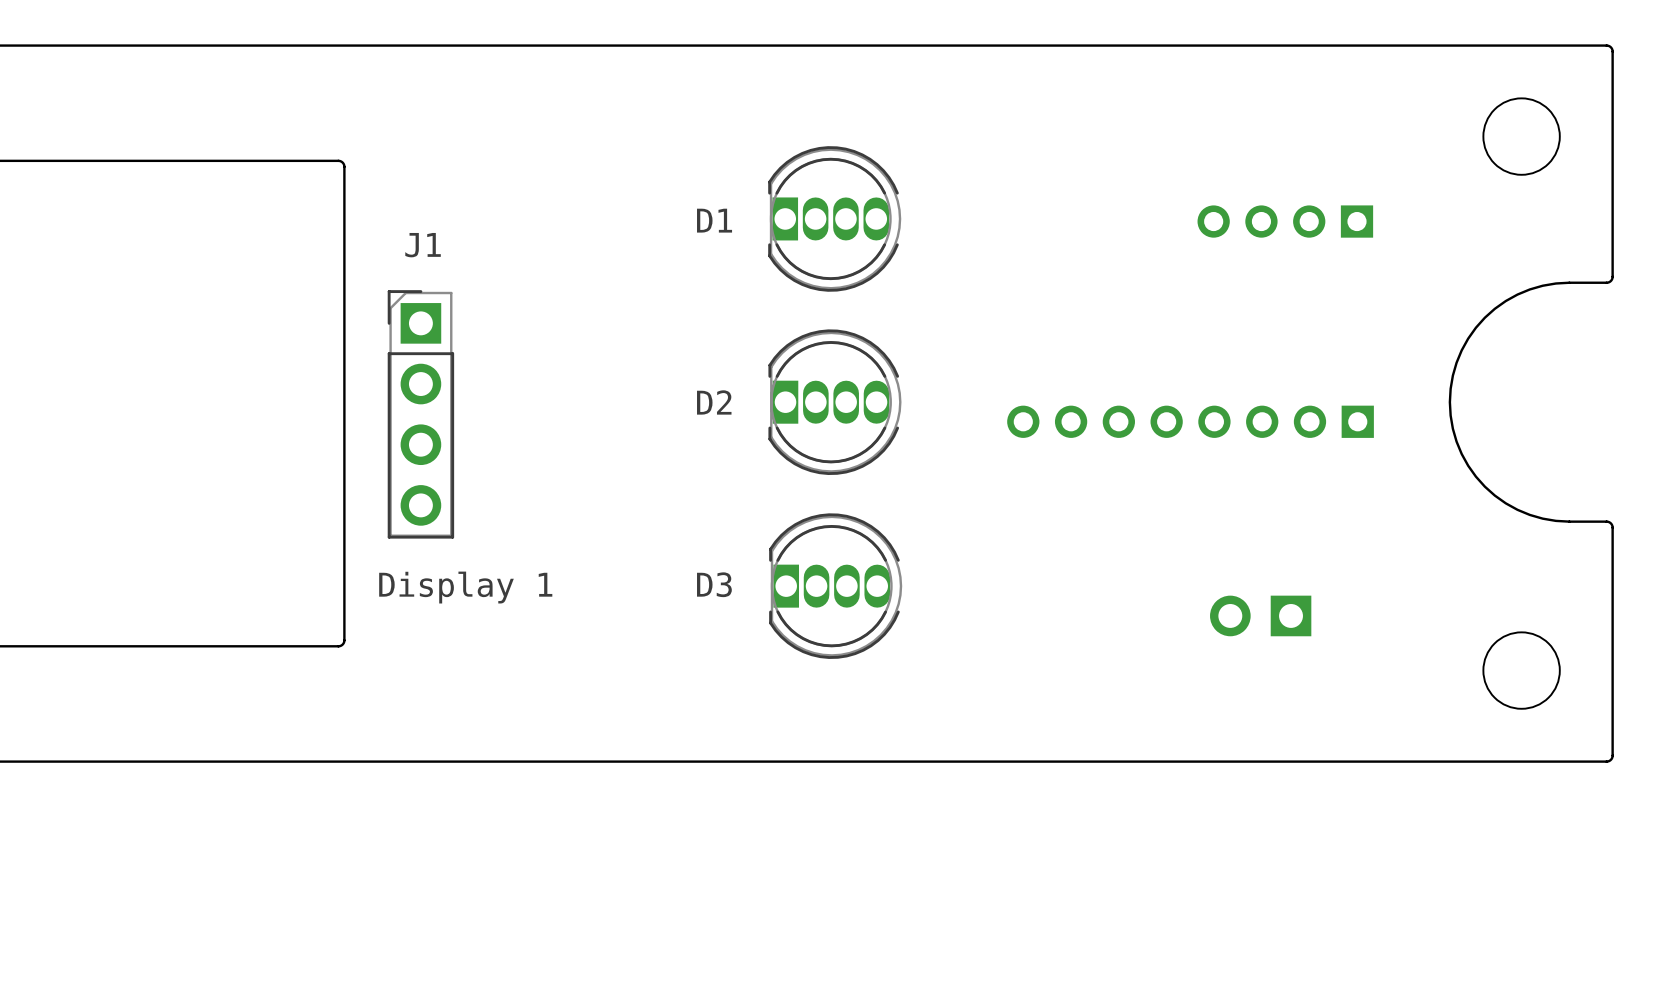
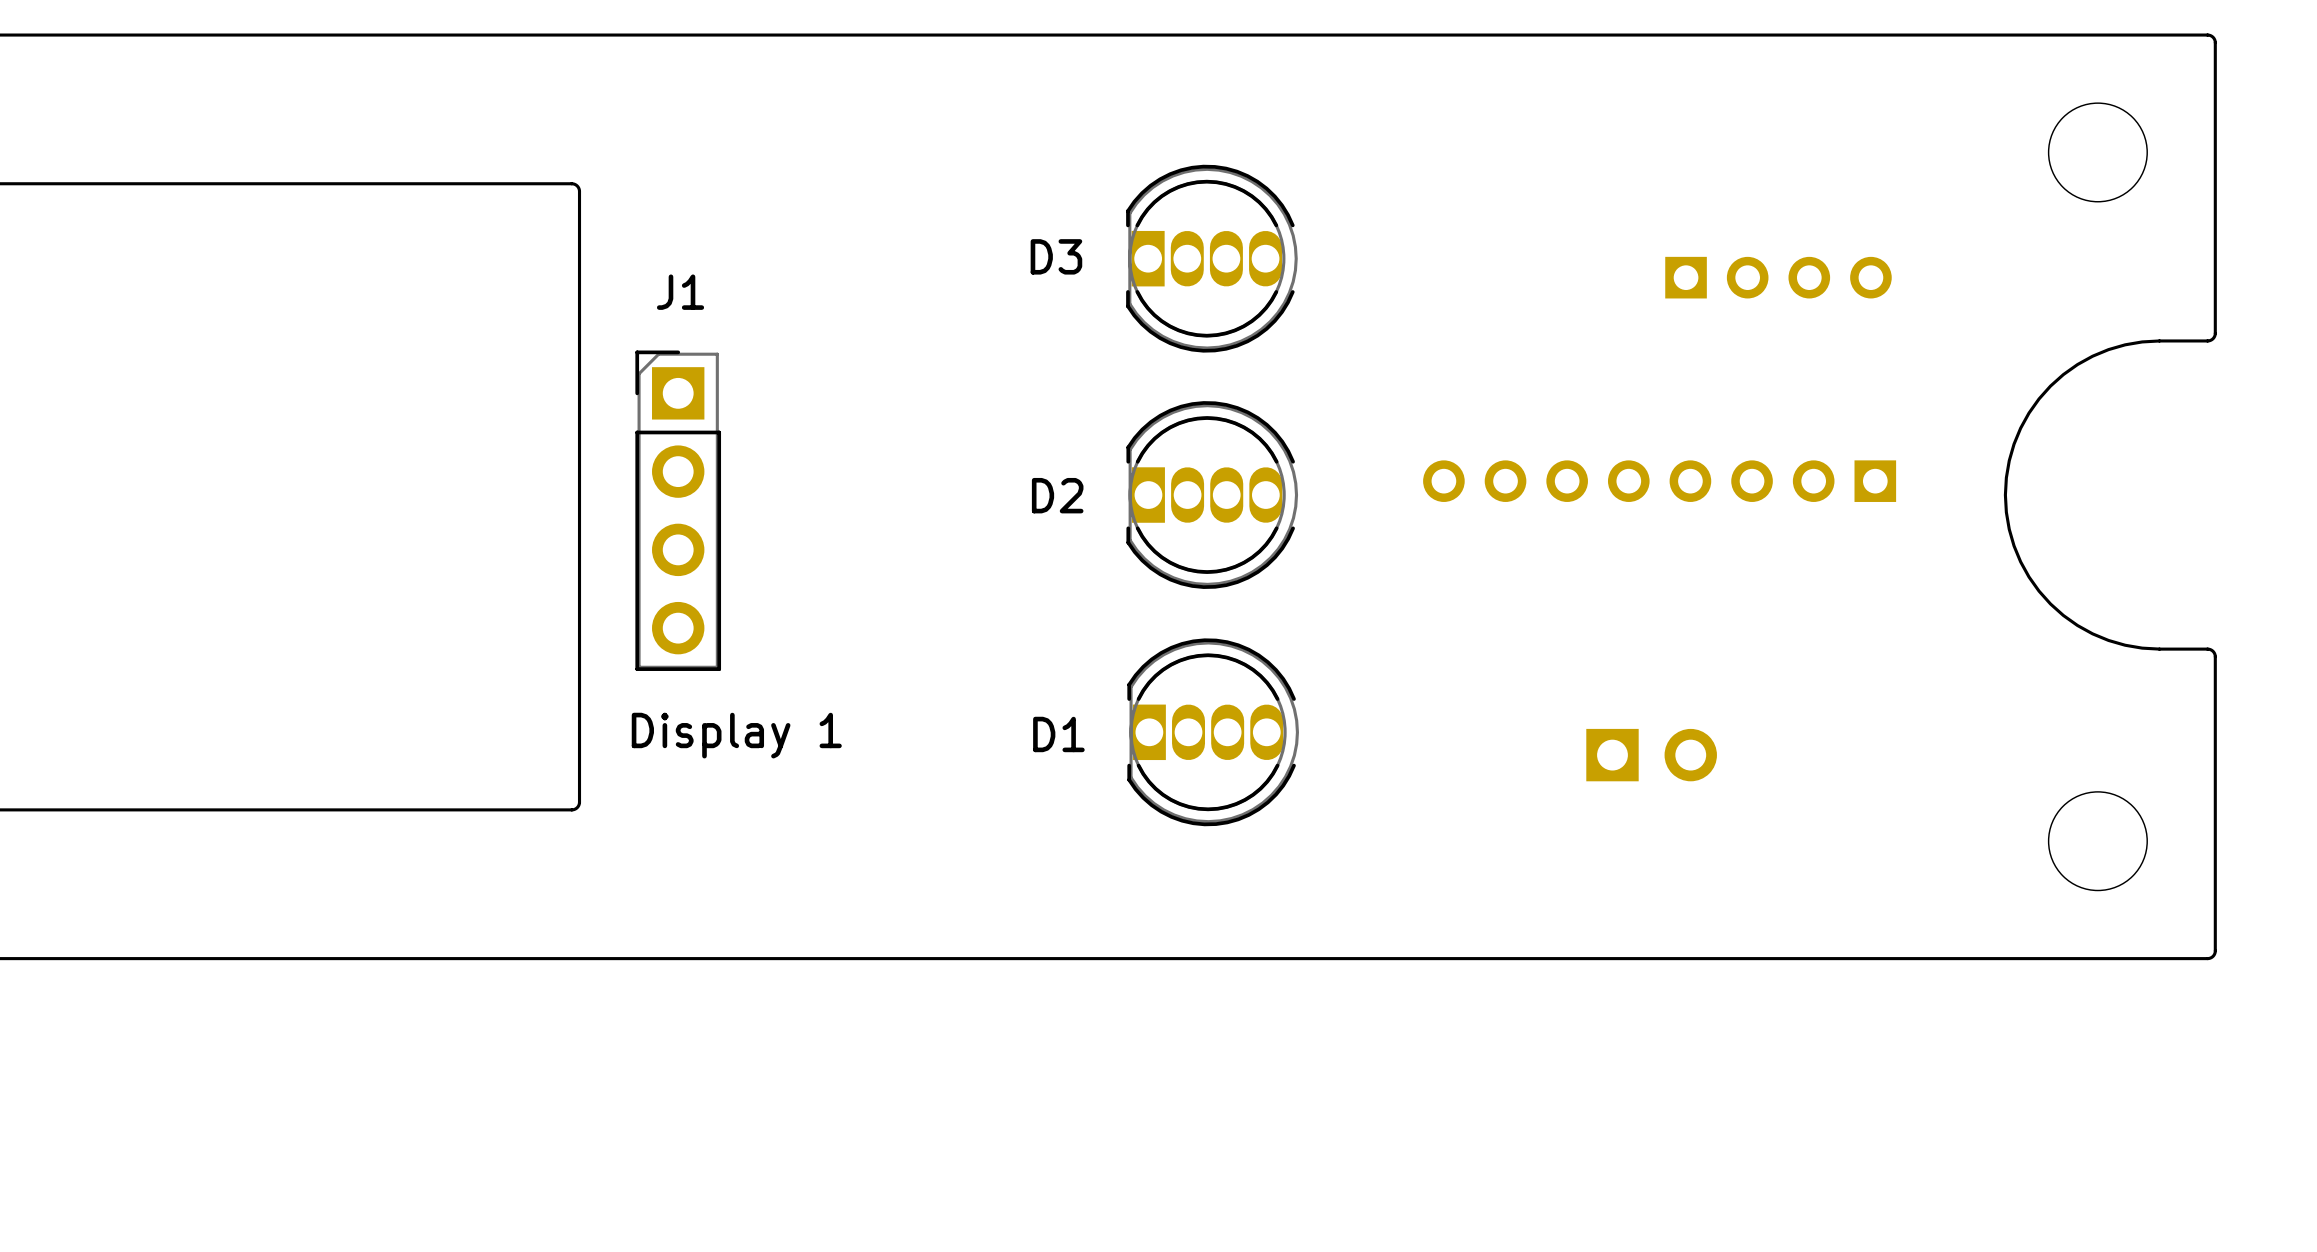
D1 name: D1 (714, 220) -> D3 (1056, 256)
part rotation: 0° (1285, 221) -> 180° (1778, 277)
part position: (1190, 421) -> (1659, 481)
D3 name: D3 (714, 584) -> D1 (1058, 734)
part rotation: 0° (1260, 615) -> 180° (1651, 755)
part position: (1260, 615) -> (1651, 755)

